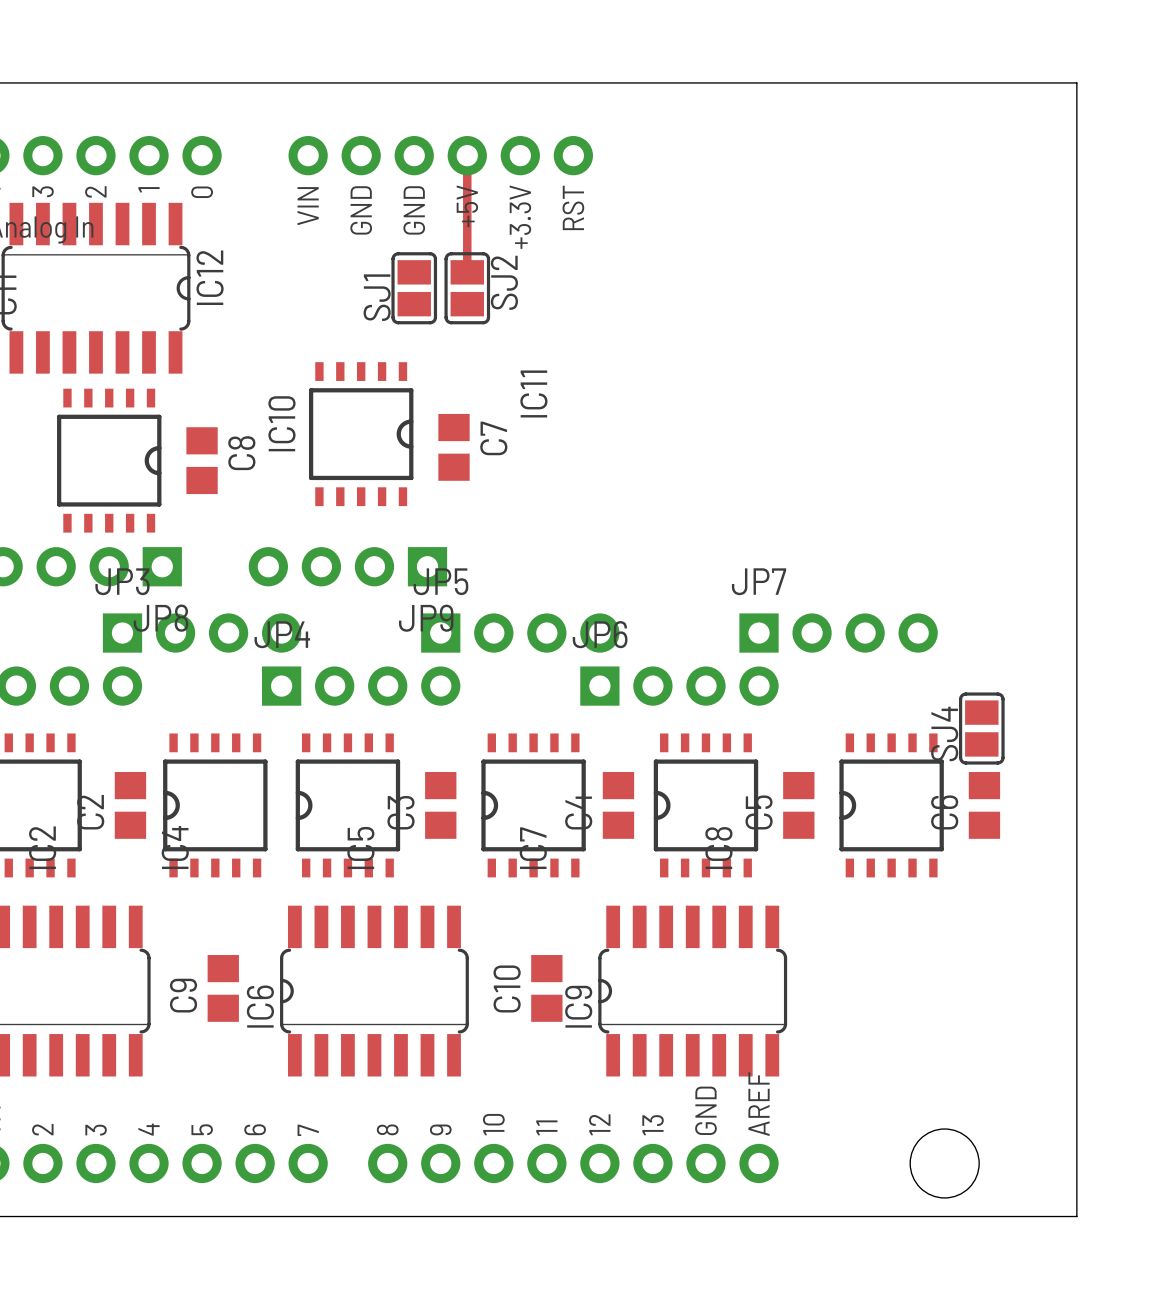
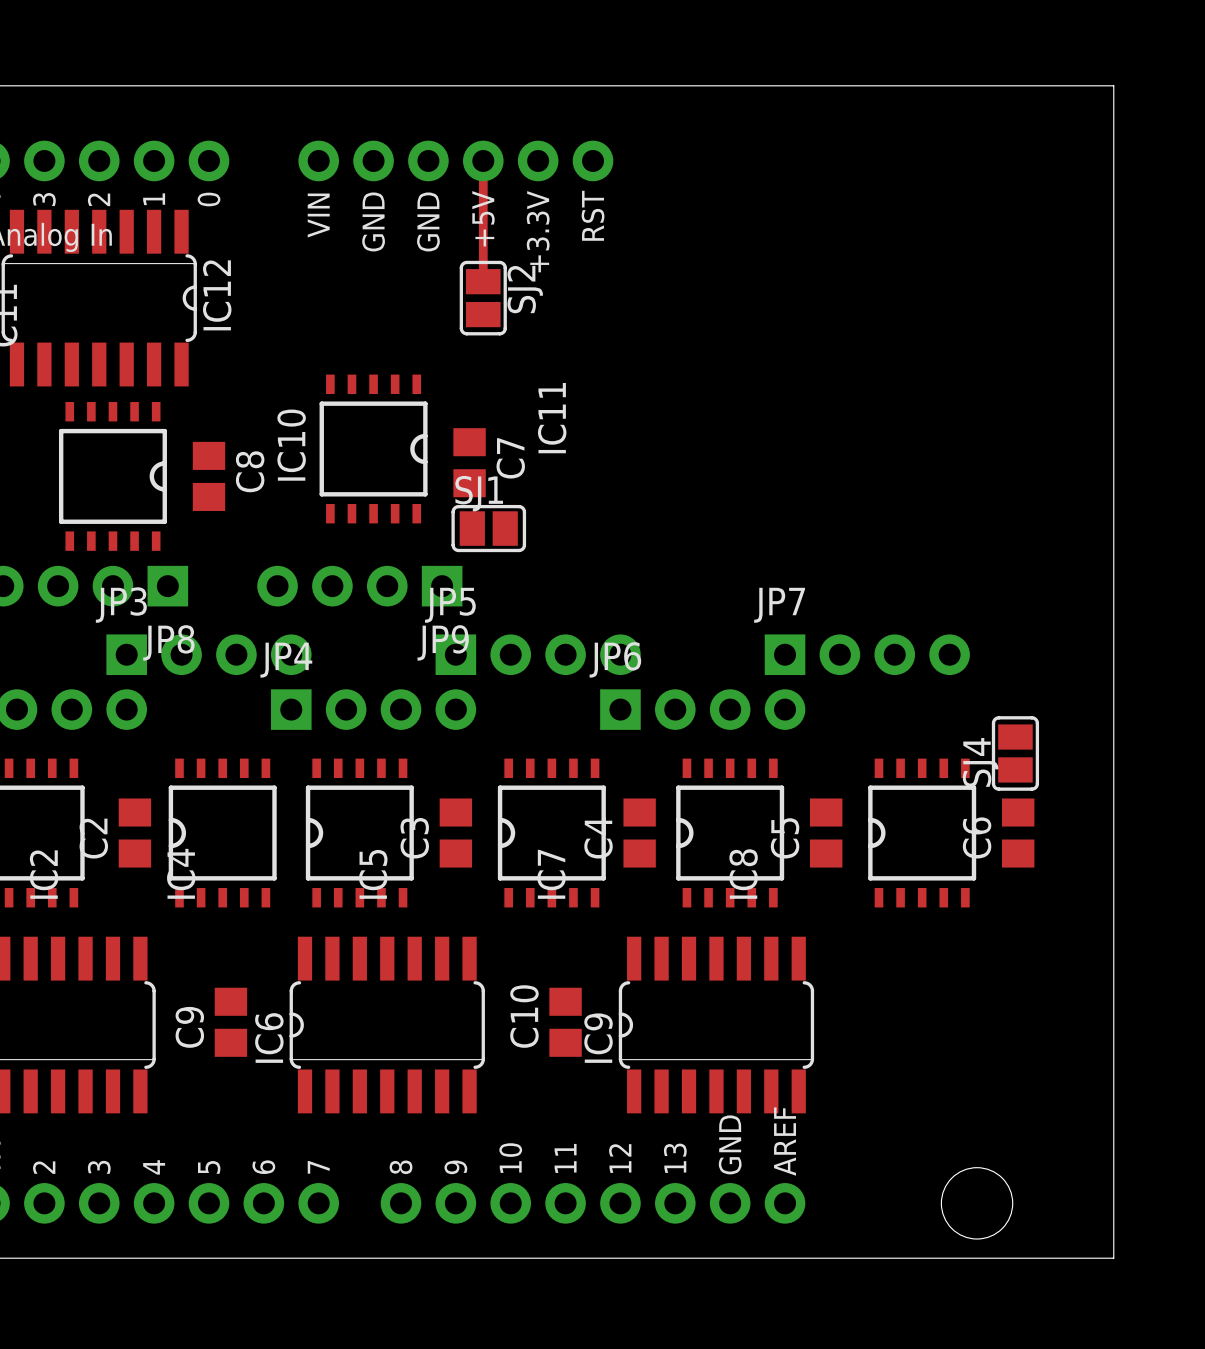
SJ1 rotation: 0° (414, 288) -> 90° clockwise (488, 528)
SJ1 position: (414, 288) -> (488, 528)

